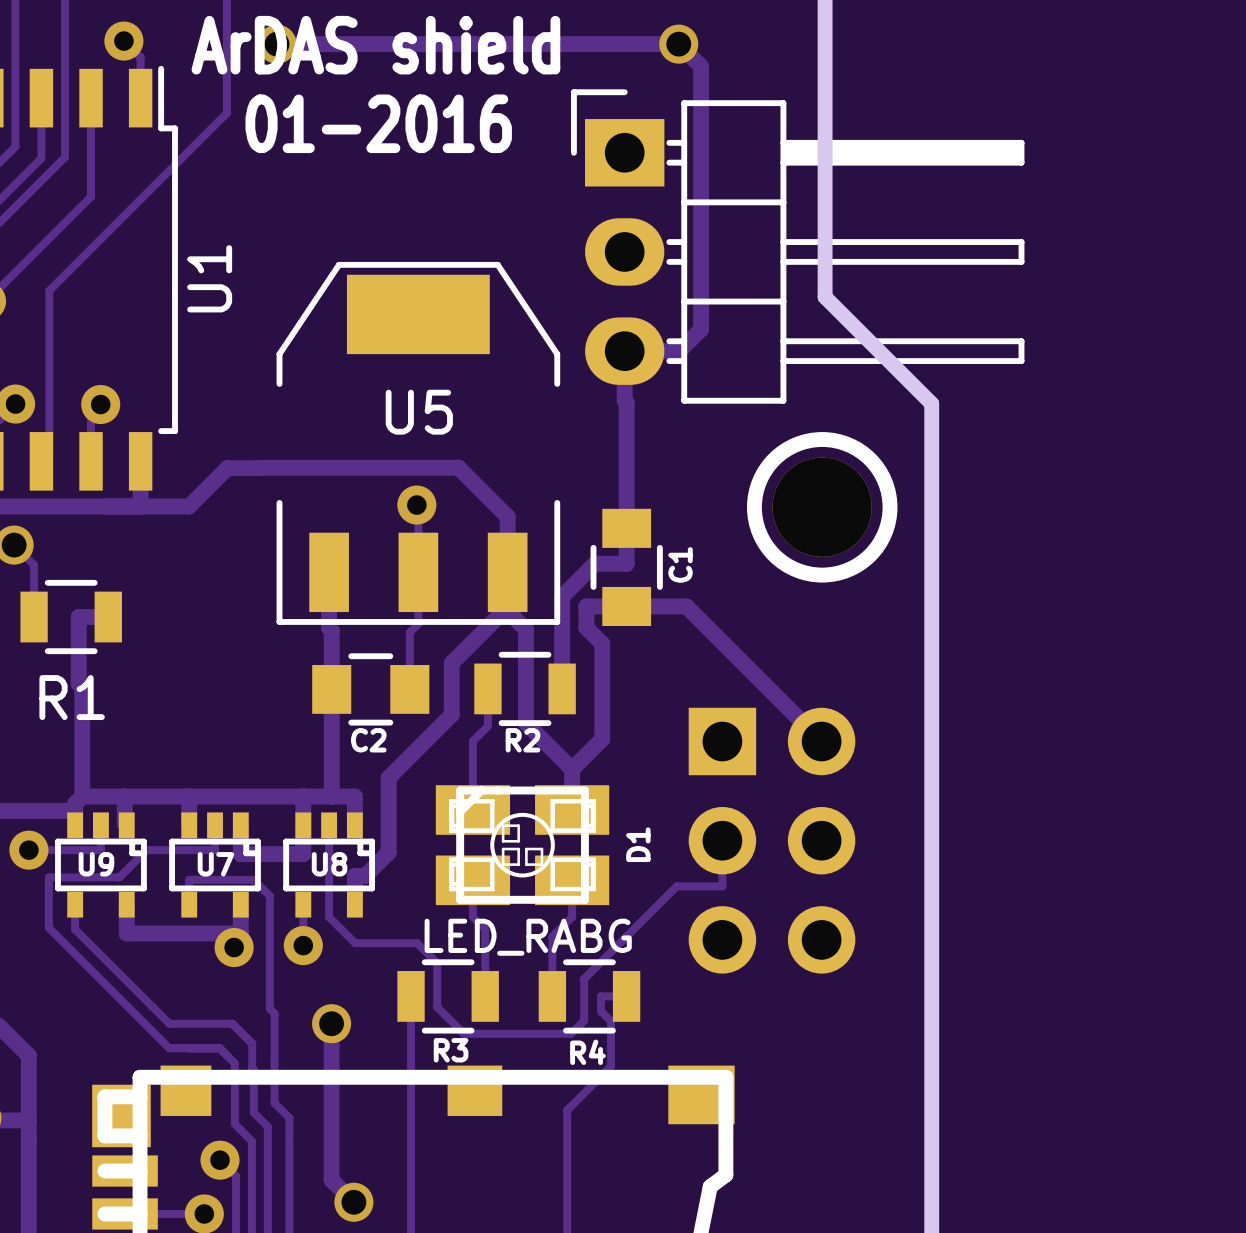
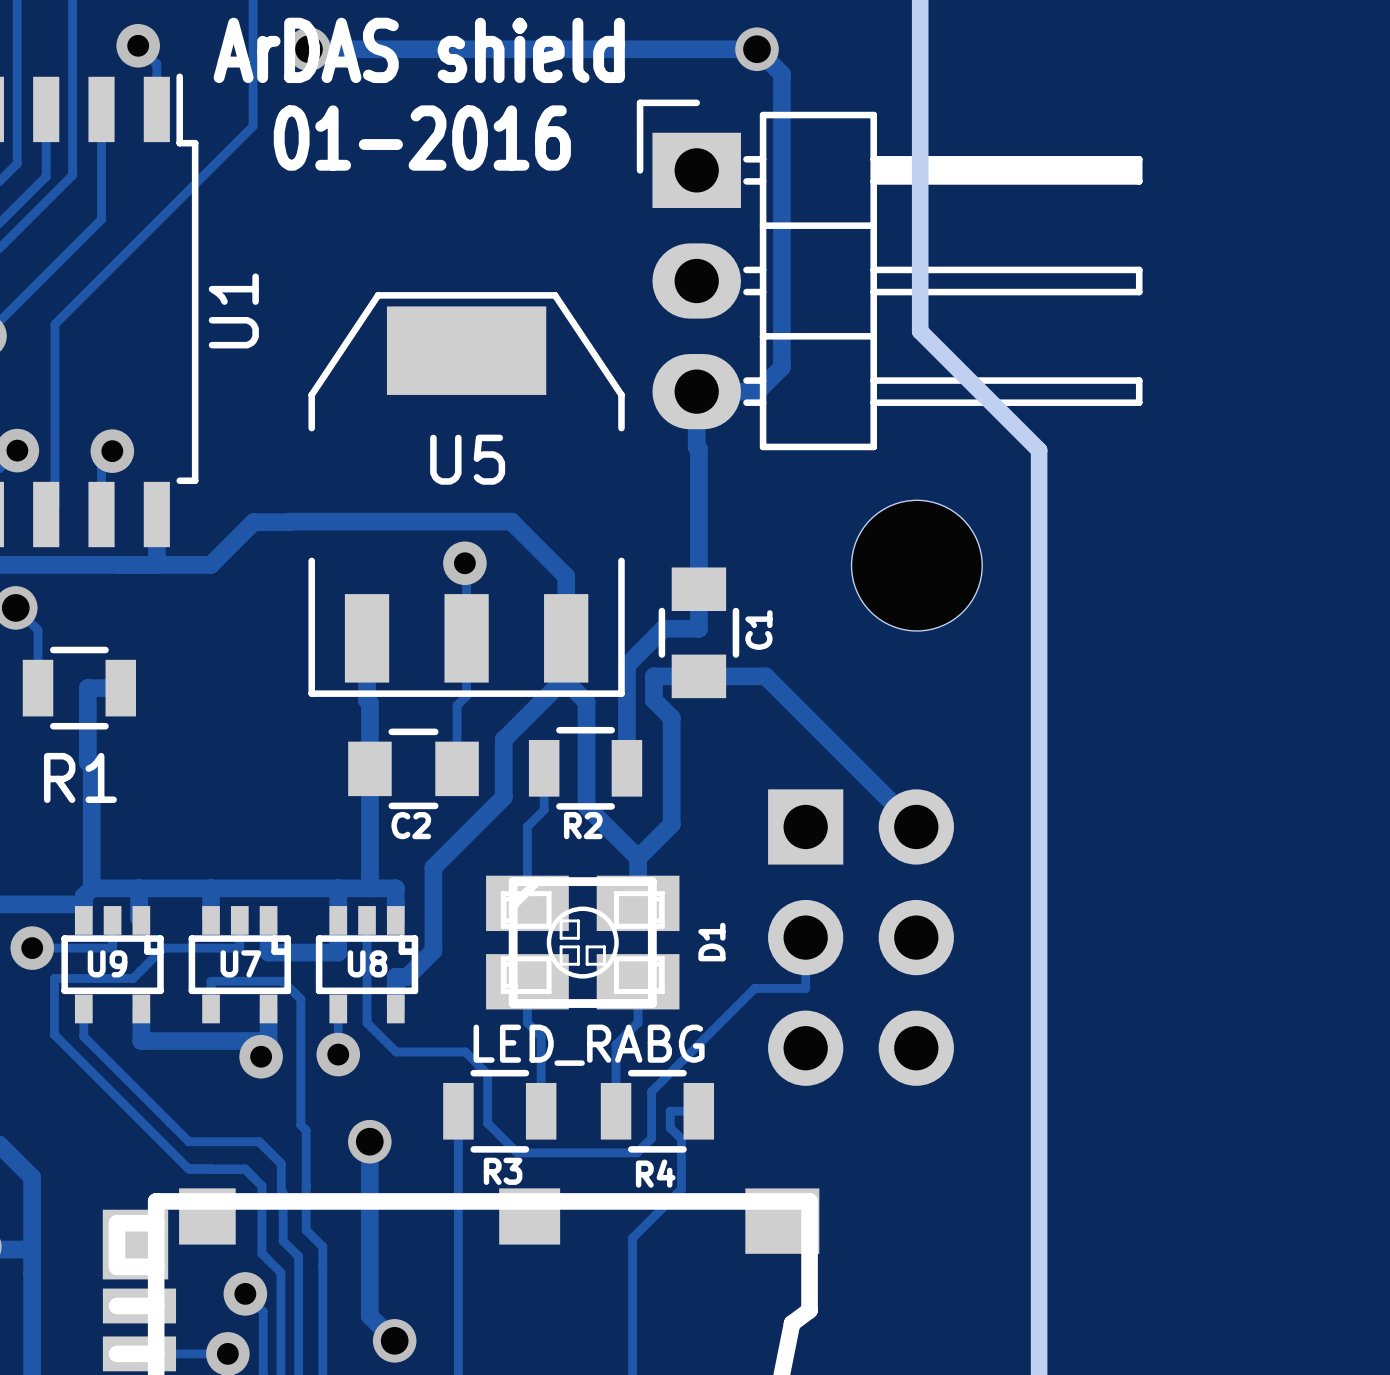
part footprint: [746, 432, 898, 583] -> [851, 500, 983, 631]

